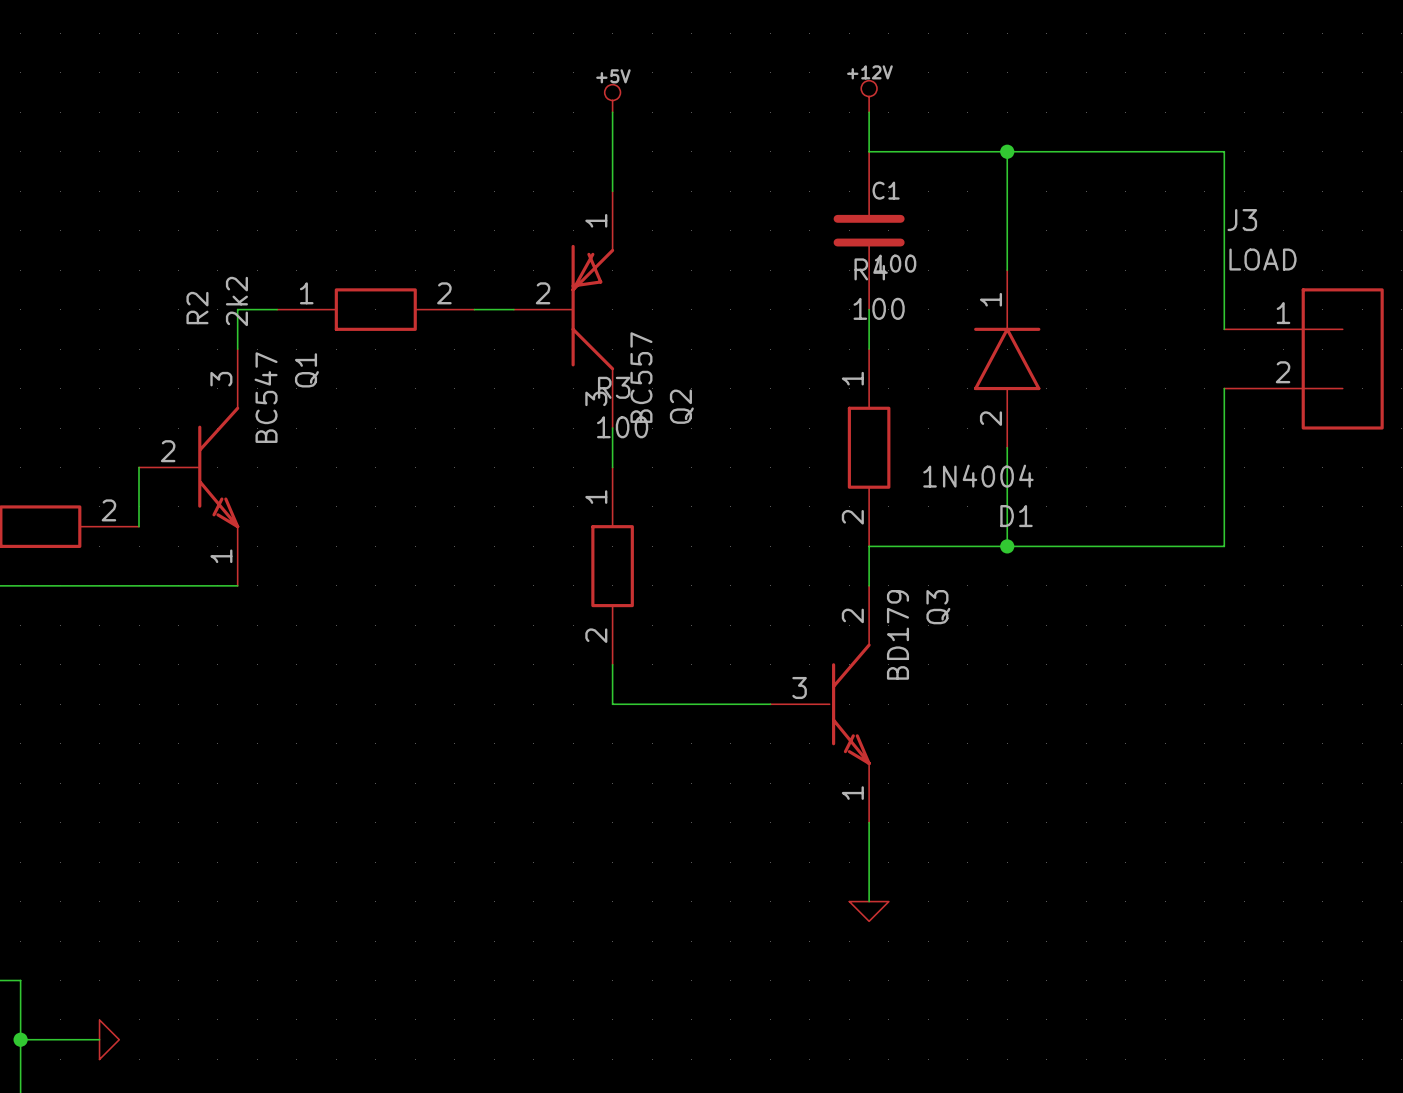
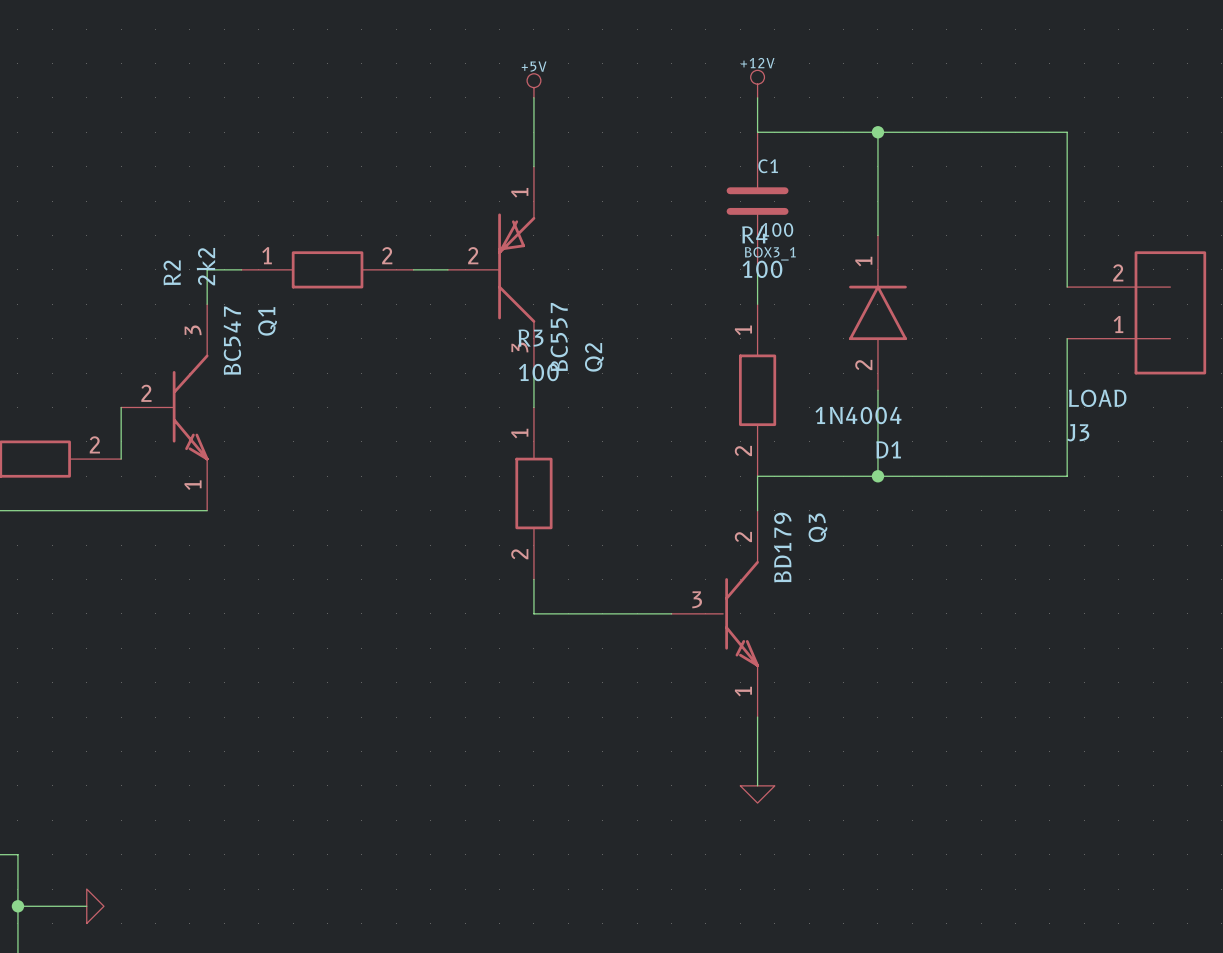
C1 text: none -> BOX3_1 (770, 253)
J3 flip: as is (1342, 358) -> up-down (1170, 312)

